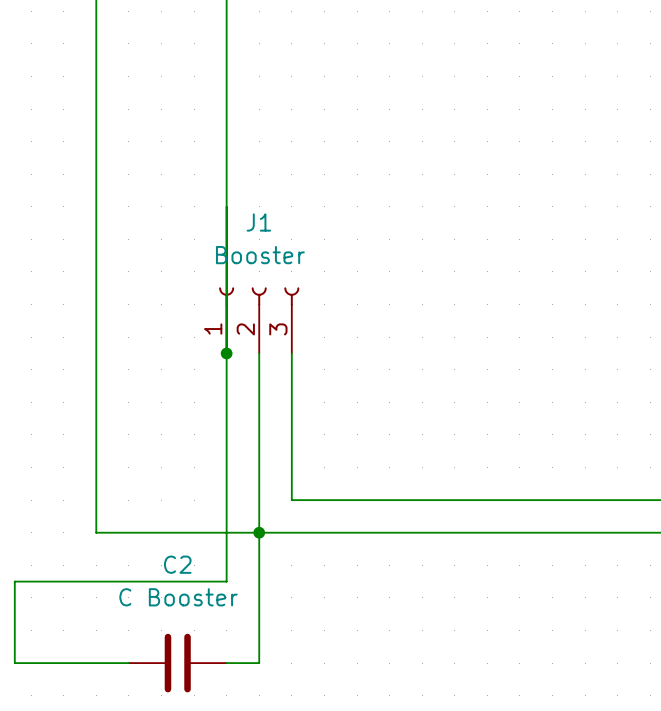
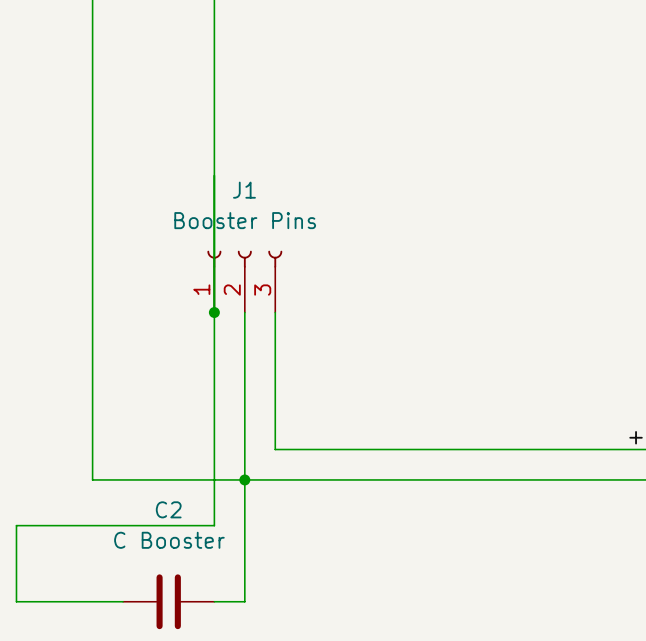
J1 value: Booster (260, 255) -> Booster Pins (245, 220)

